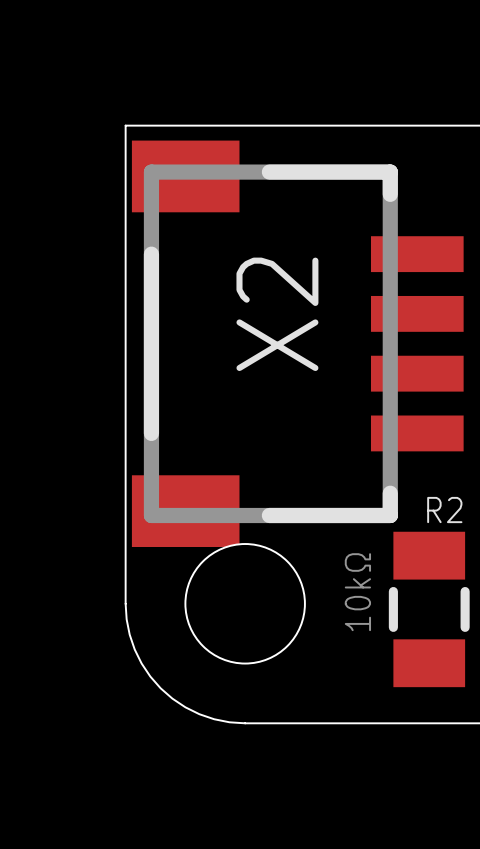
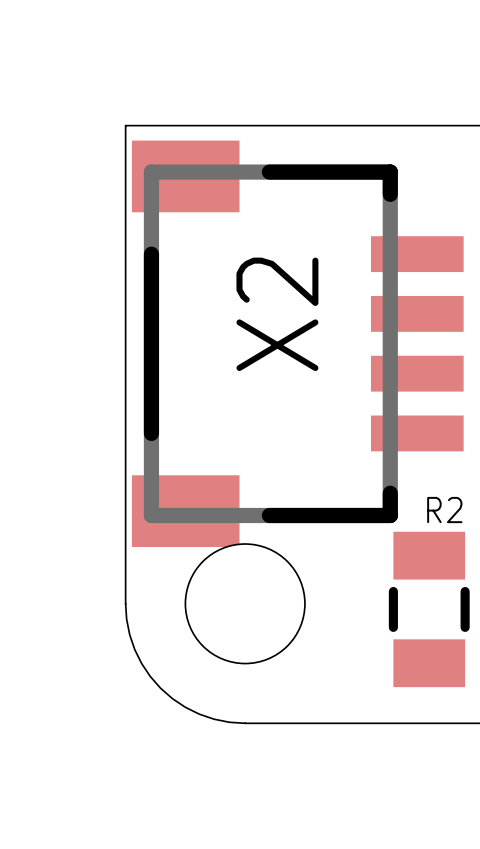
R2 value: 10kΩ (357, 592) -> none

